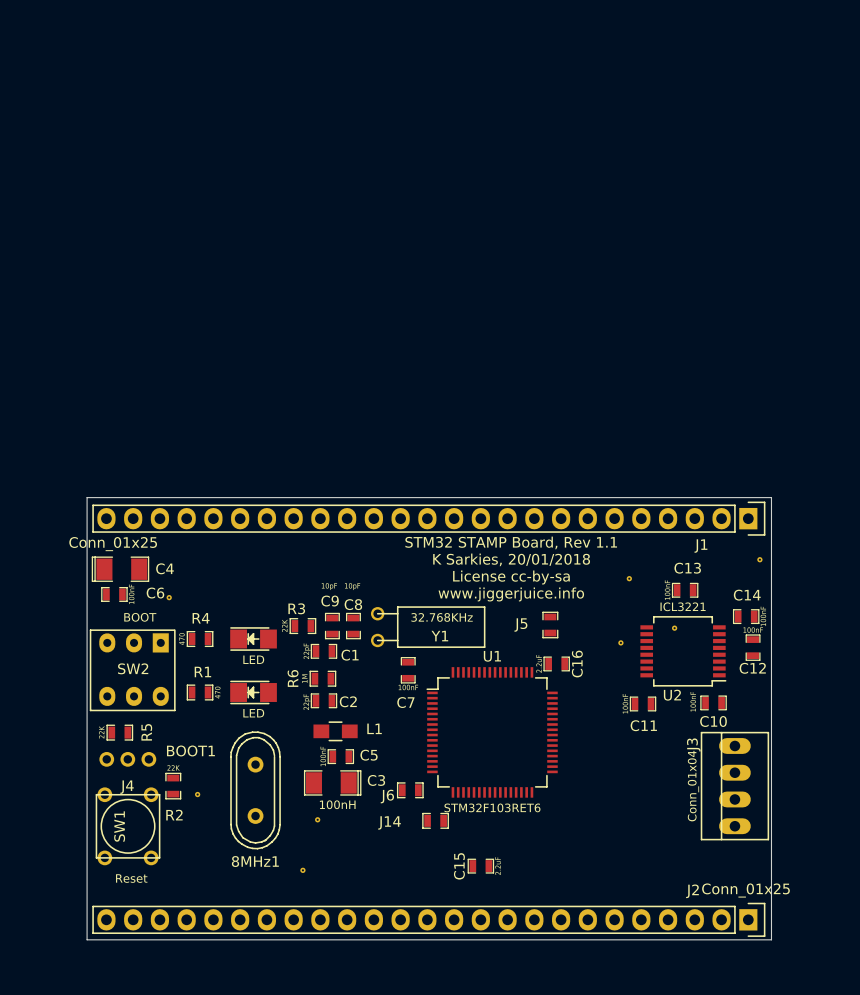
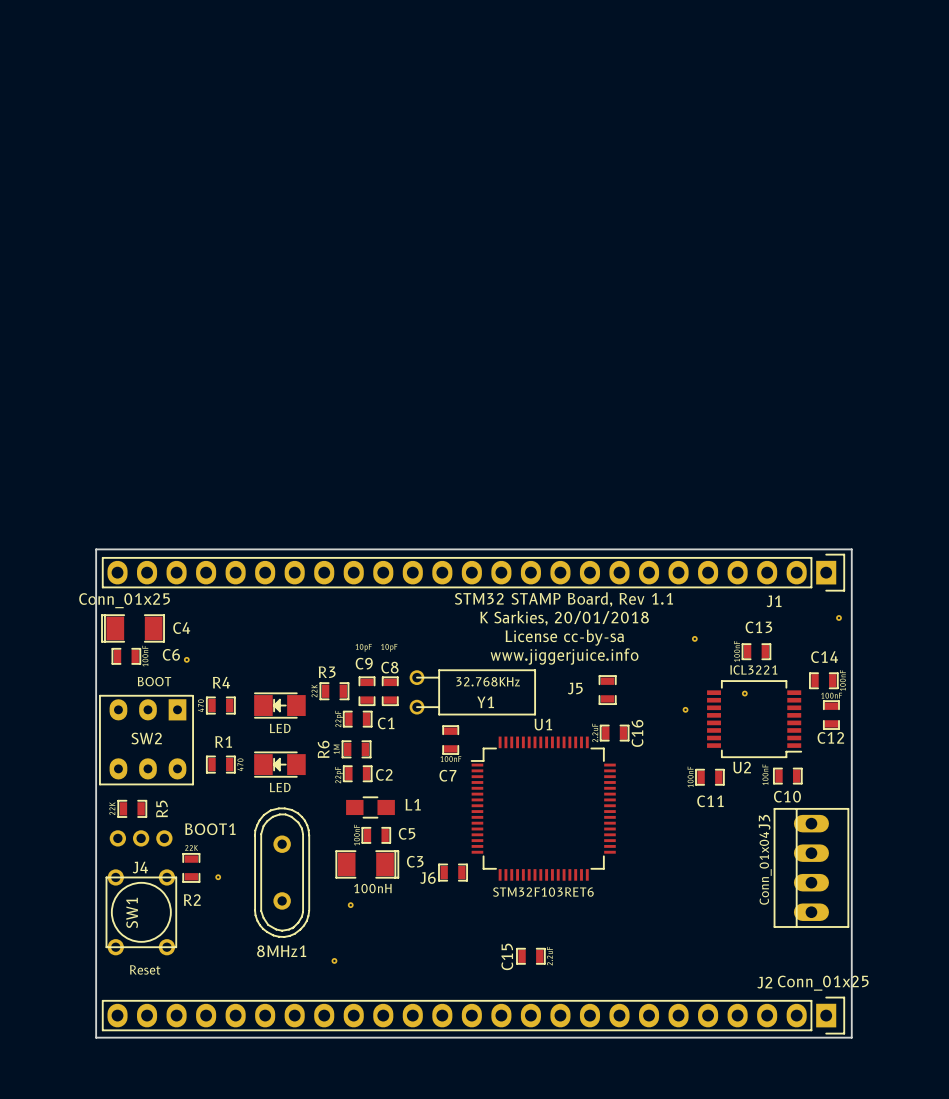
J14: (435, 820) -> none

